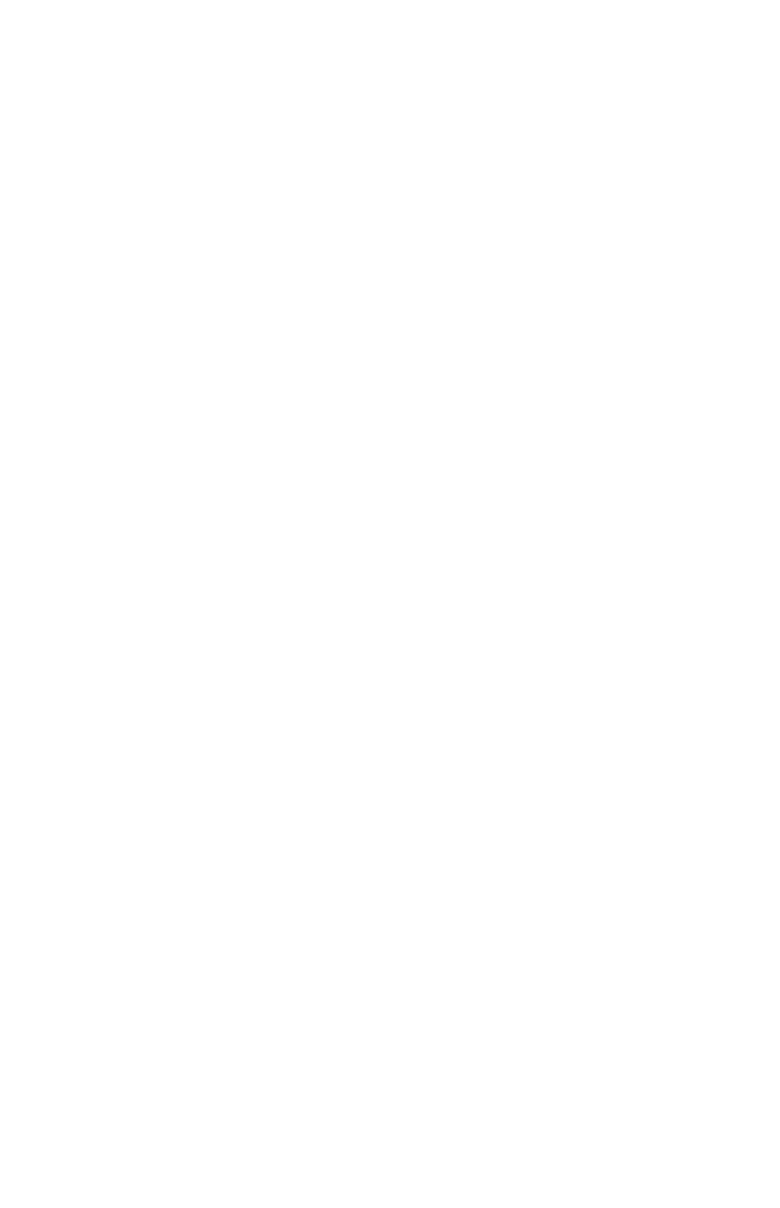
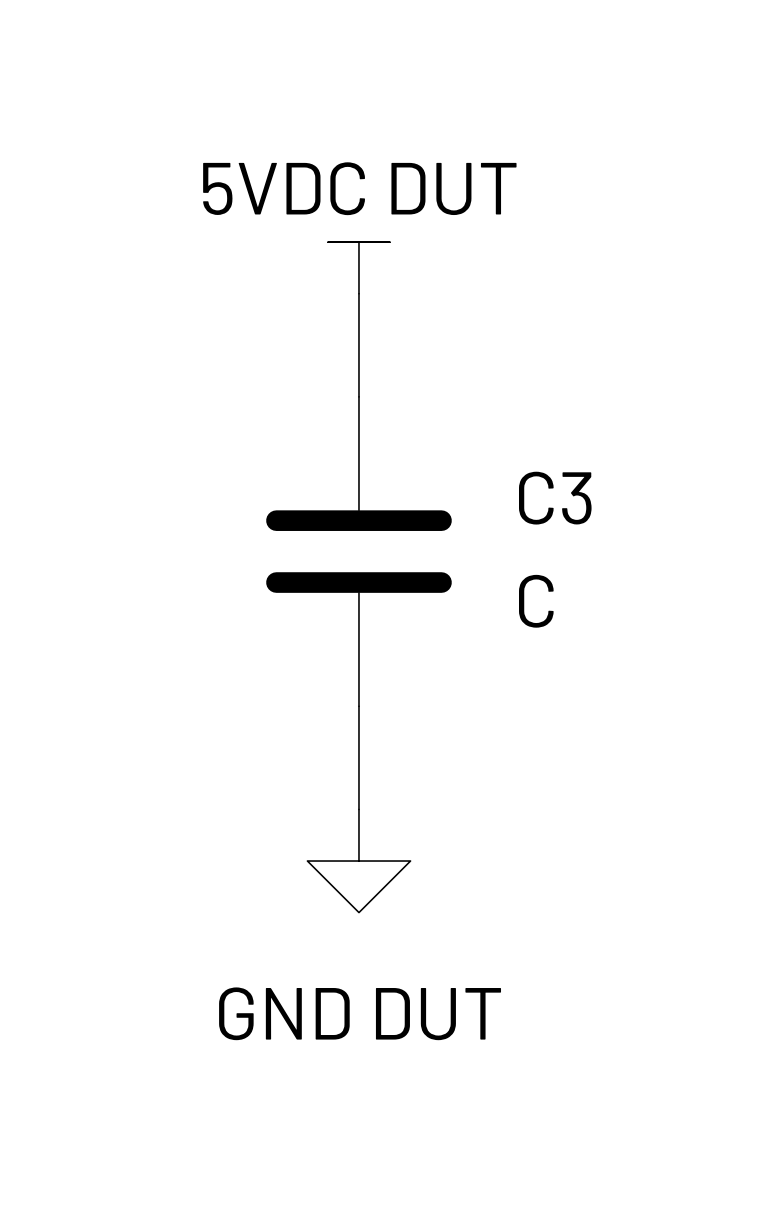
power symbol: none -> 5VDC DUT (358, 267)
wire: none -> (358, 293) (358, 396)
C3: none -> C (358, 551)
wire: none -> (358, 706) (358, 809)
power symbol: none -> GND DUT (358, 861)

